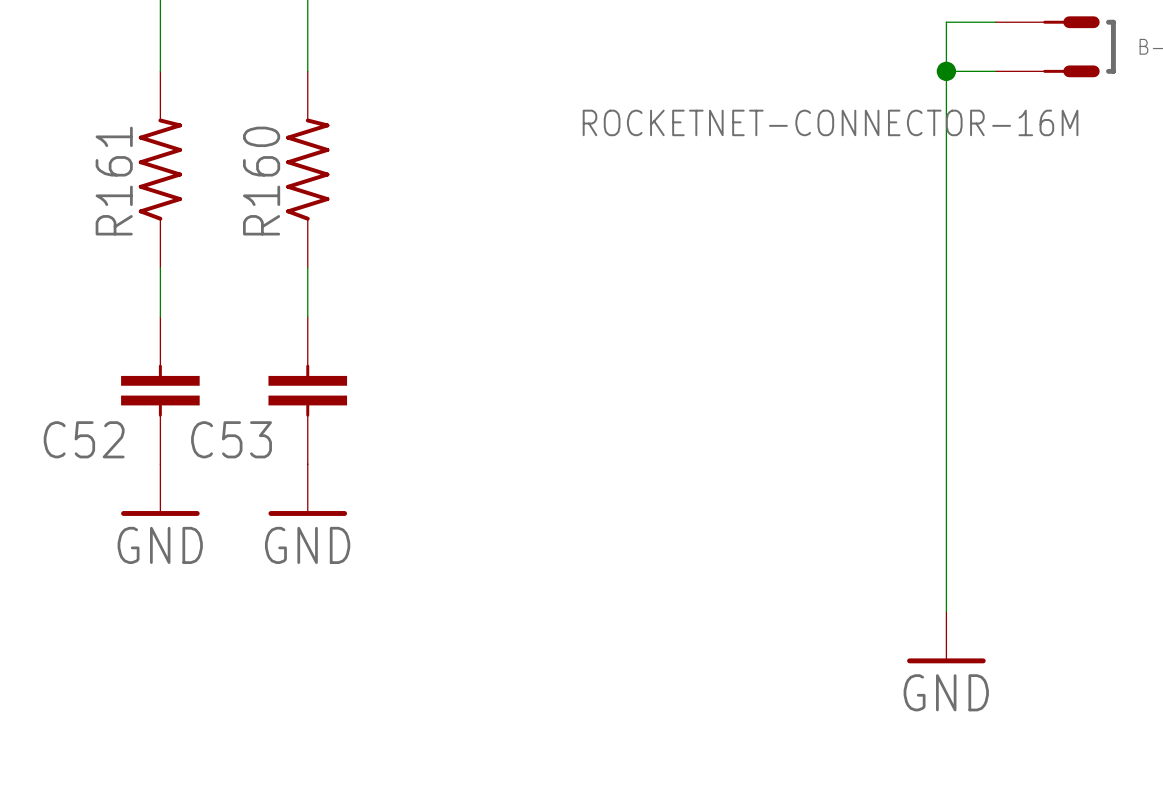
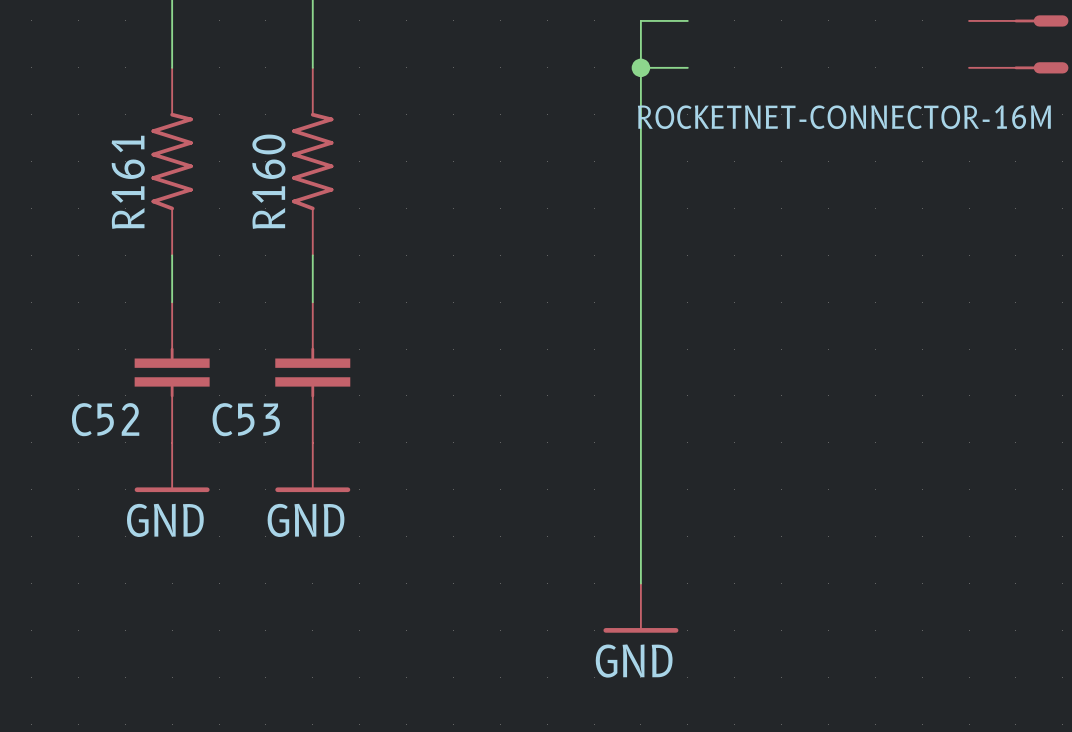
wire: (995, 22) (946, 22) (946, 611) -> (687, 20) (640, 20) (640, 583)
junction: none -> (640, 67)
wire: (946, 71) (995, 71) -> (640, 67) (687, 67)
junction: (946, 71) -> none
power symbol position: GND (946, 637) -> GND (640, 608)

